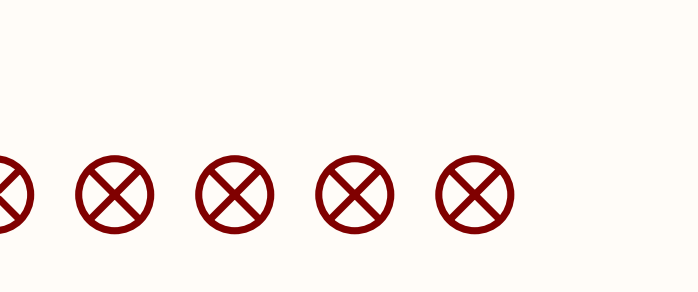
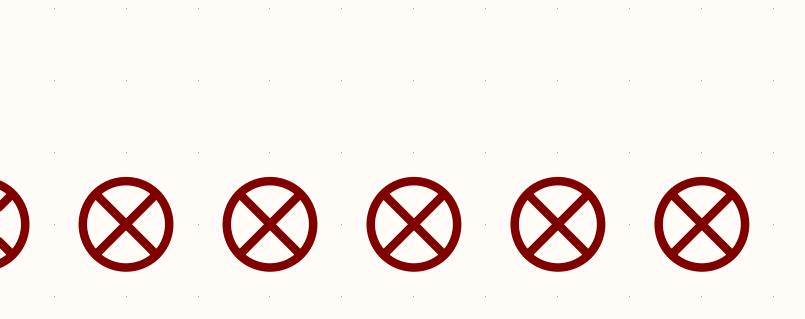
part: none -> (701, 224)

